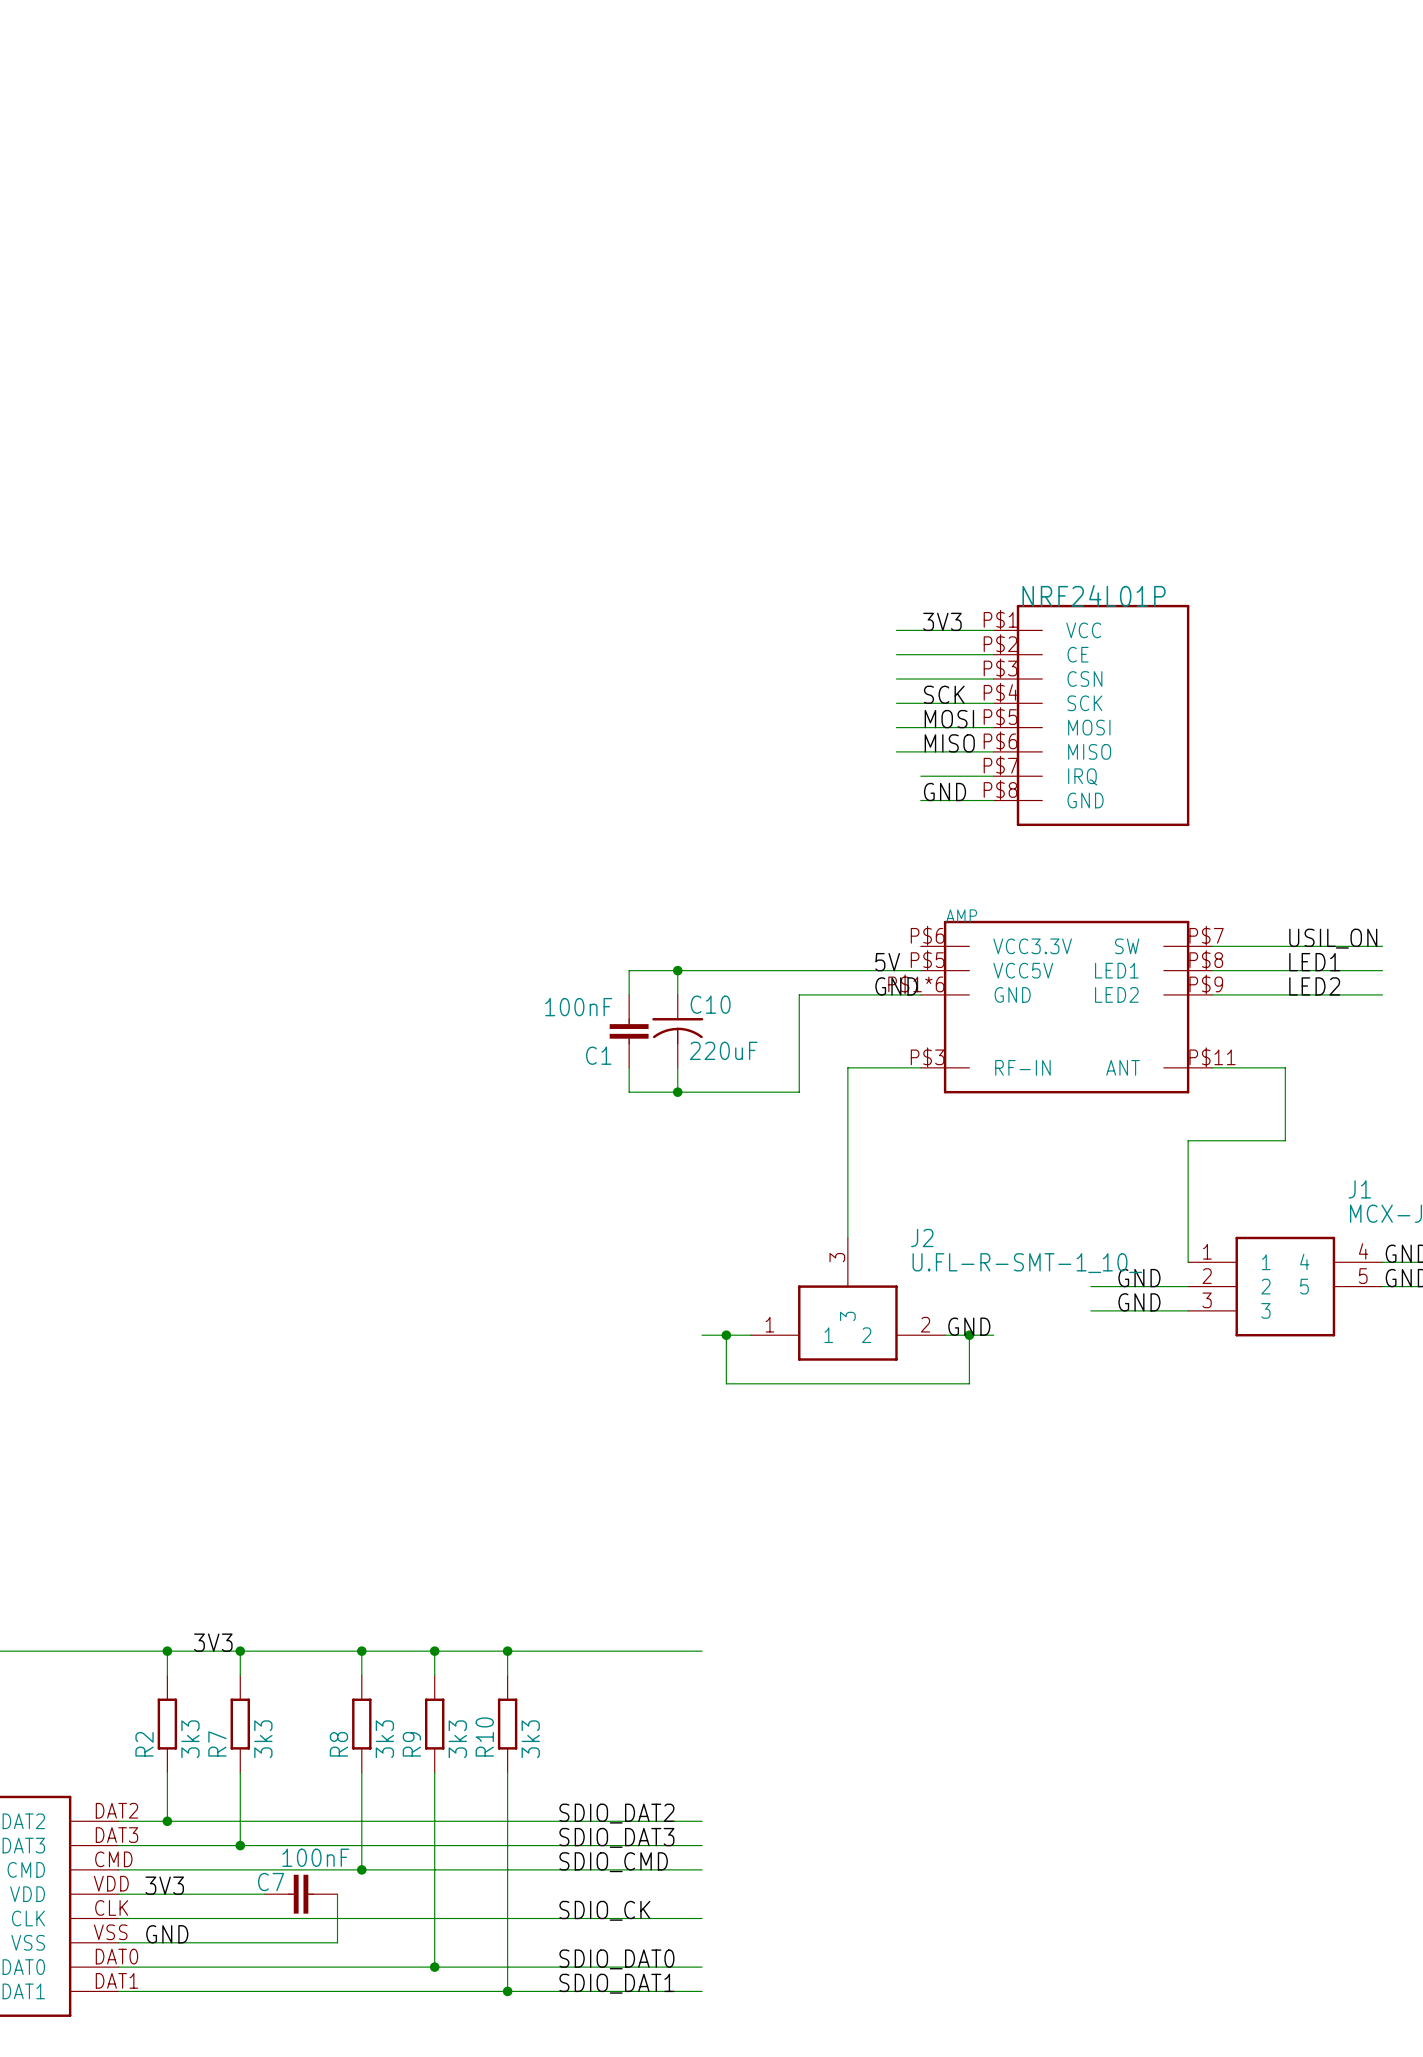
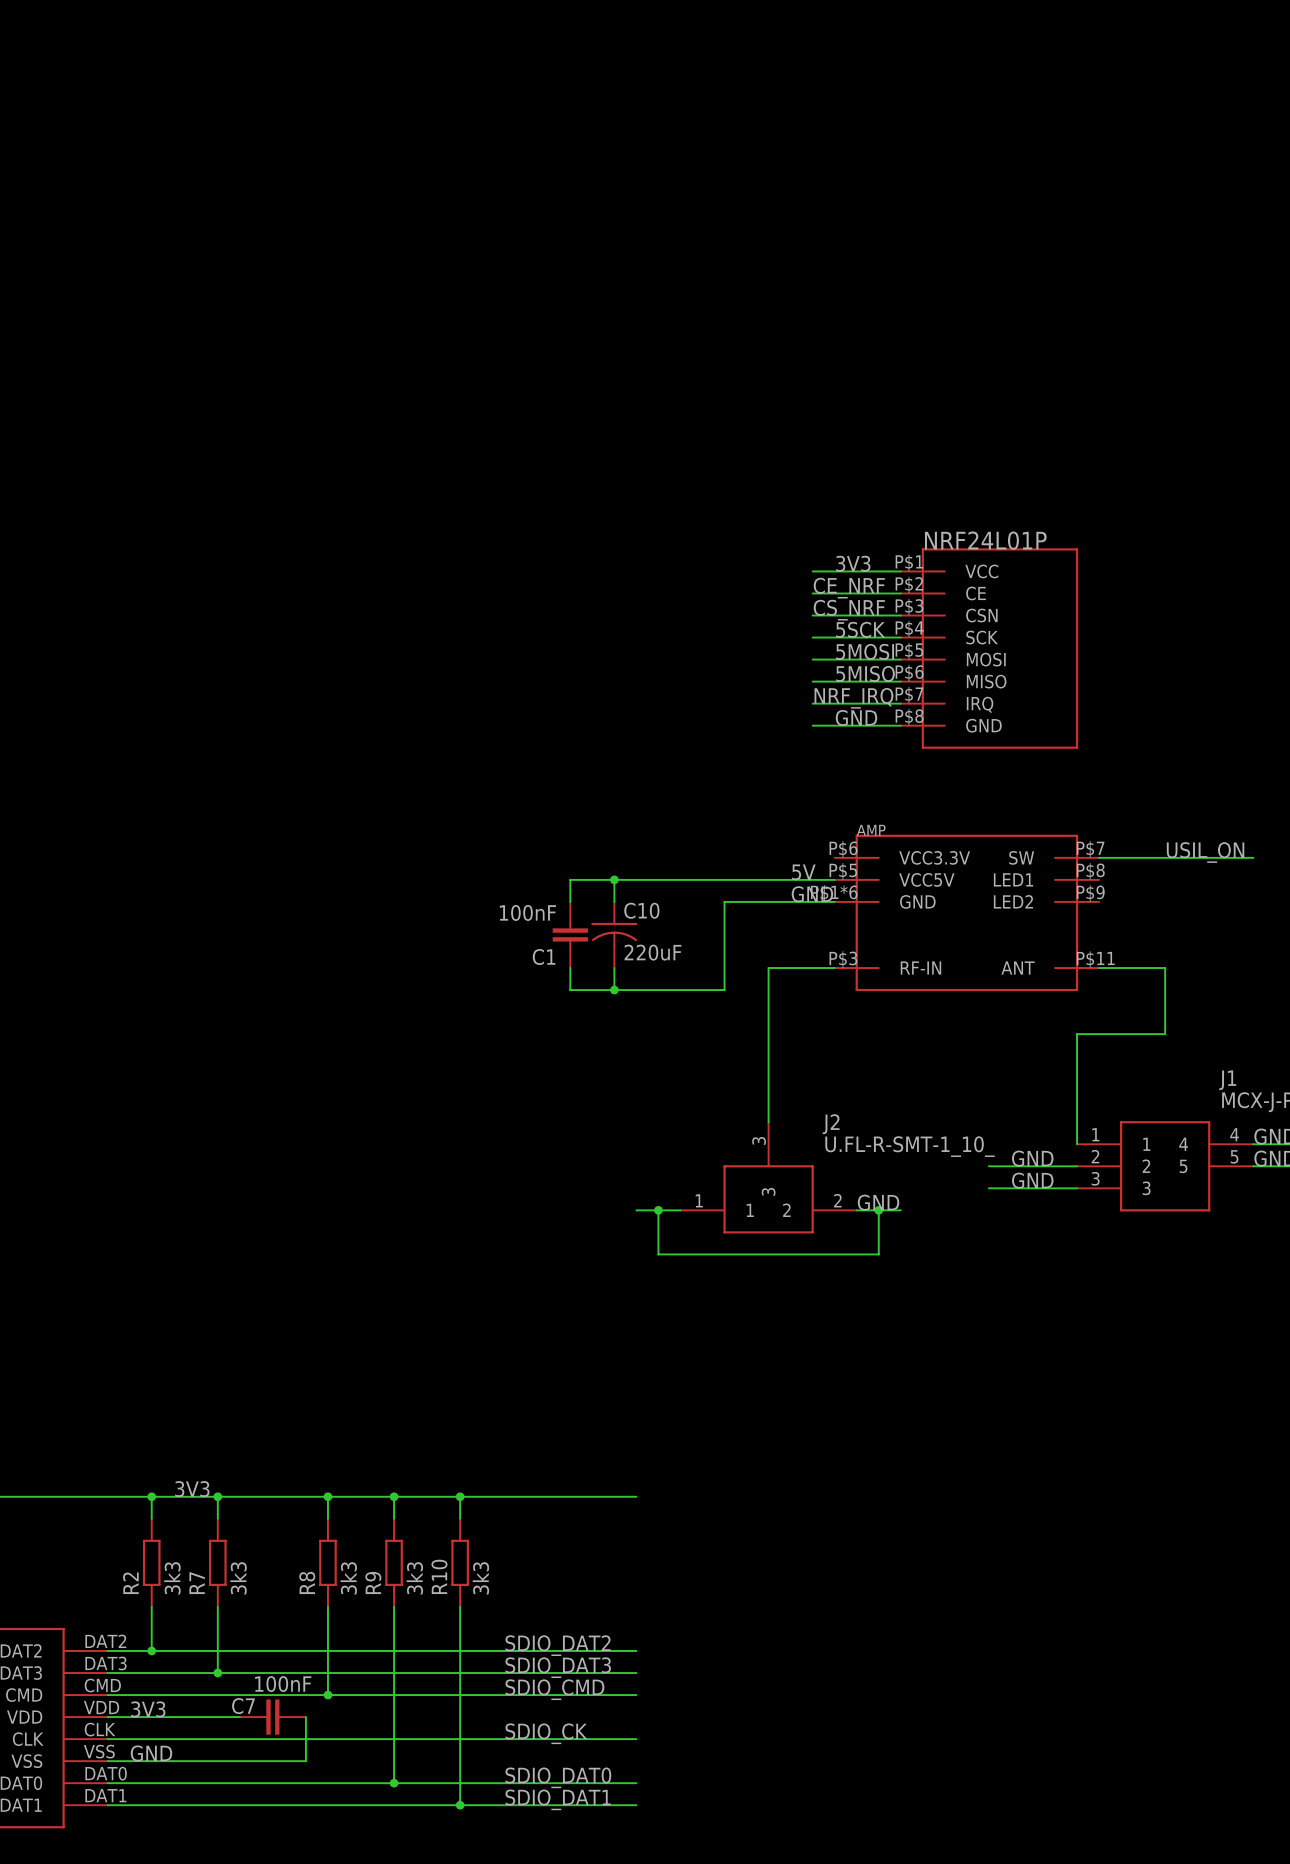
label: none -> CE_NRF (849, 588)
label: none -> CS_NRF (849, 610)
label: SCK (944, 694) -> 5SCK (860, 629)
label: MOSI (949, 719) -> 5MOSI (865, 651)
label: MISO (949, 743) -> 5MISO (865, 673)
label: none -> NRF_IRQ (853, 698)
wire: none -> (812, 703) (834, 703)
wire: none -> (812, 725) (834, 725)
label: LED1 (1314, 962) -> none
wire: (1212, 970) (1382, 970) -> none
label: LED2 (1314, 986) -> none
wire: (1212, 994) (1382, 994) -> none

